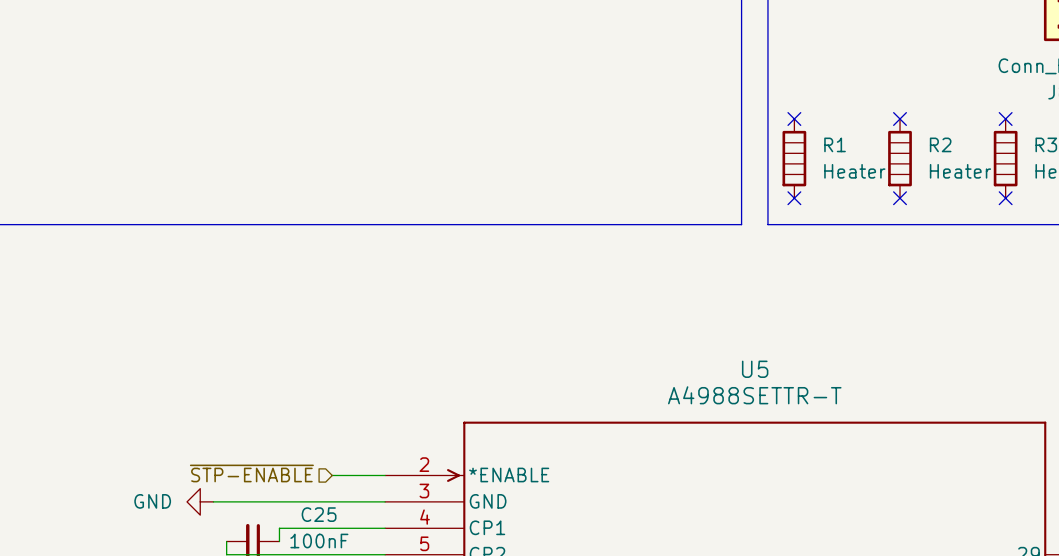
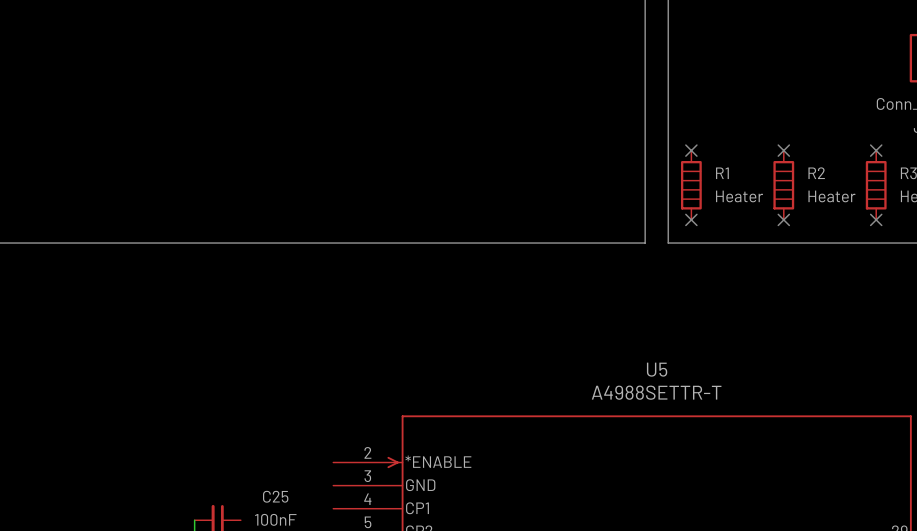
hierarchical label: ~{STP-ENABLE} (251, 473) -> none
wire: (332, 475) (385, 475) -> none
power symbol: GND (200, 501) -> none
wire: (213, 501) (385, 501) -> none
wire: (385, 528) (279, 528) (279, 541) -> none

